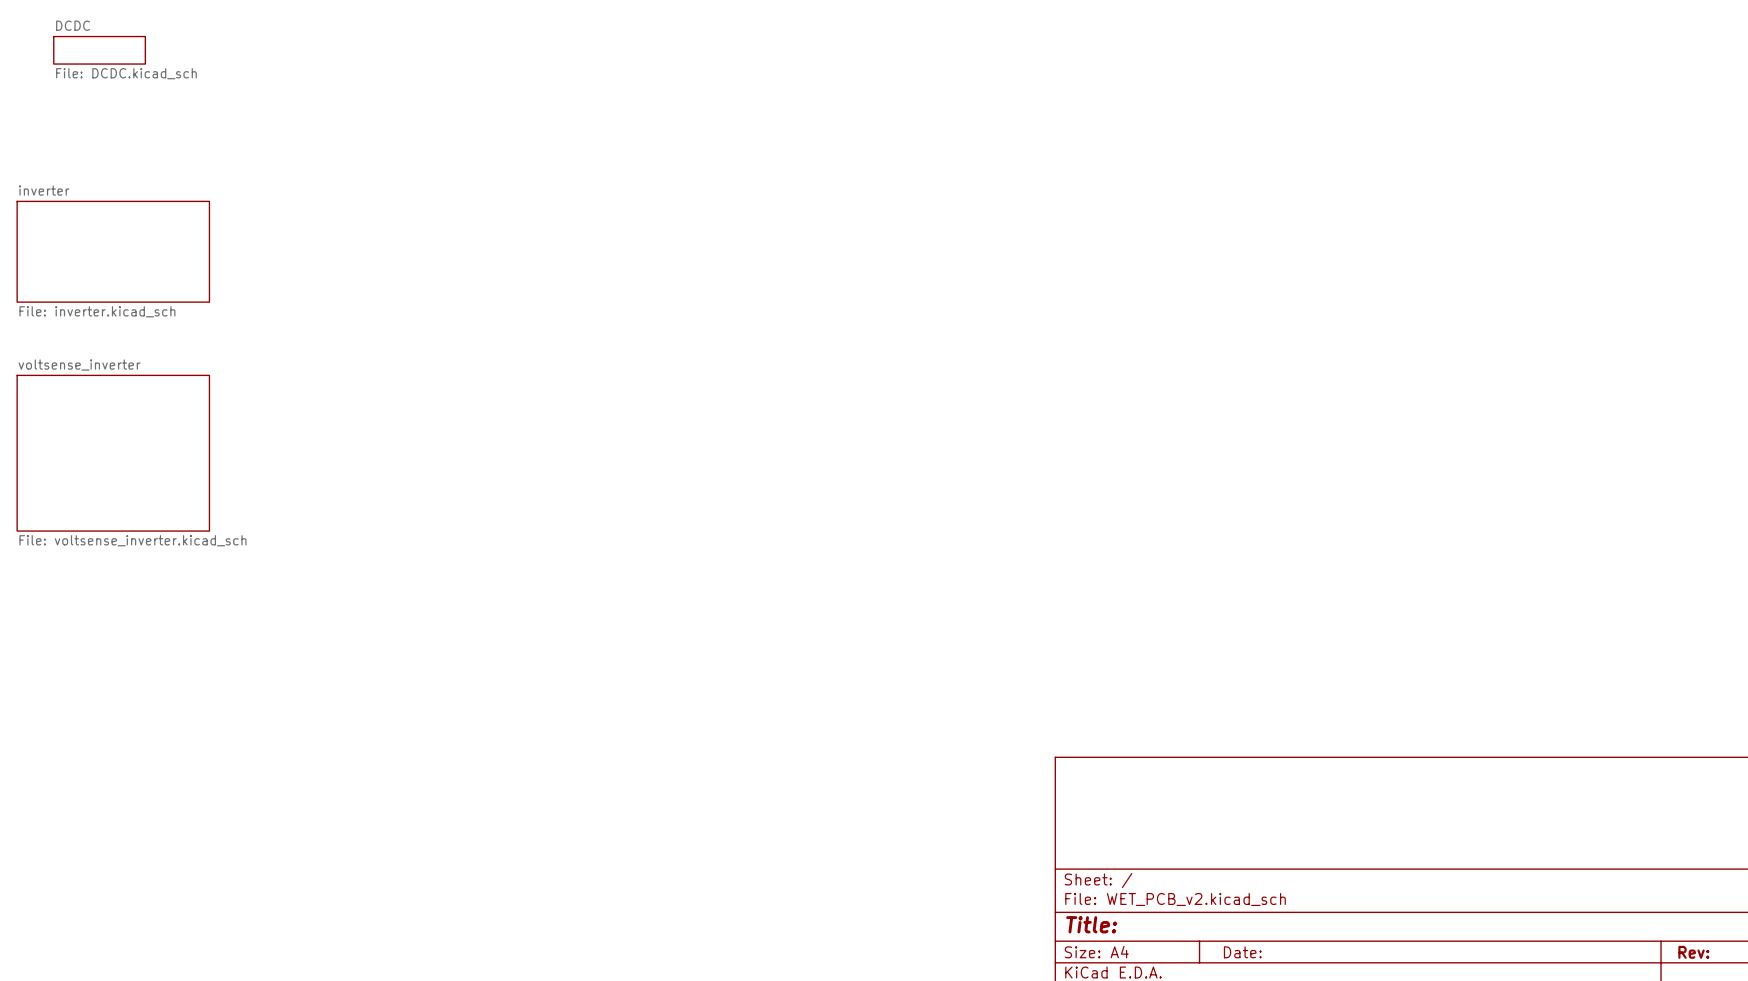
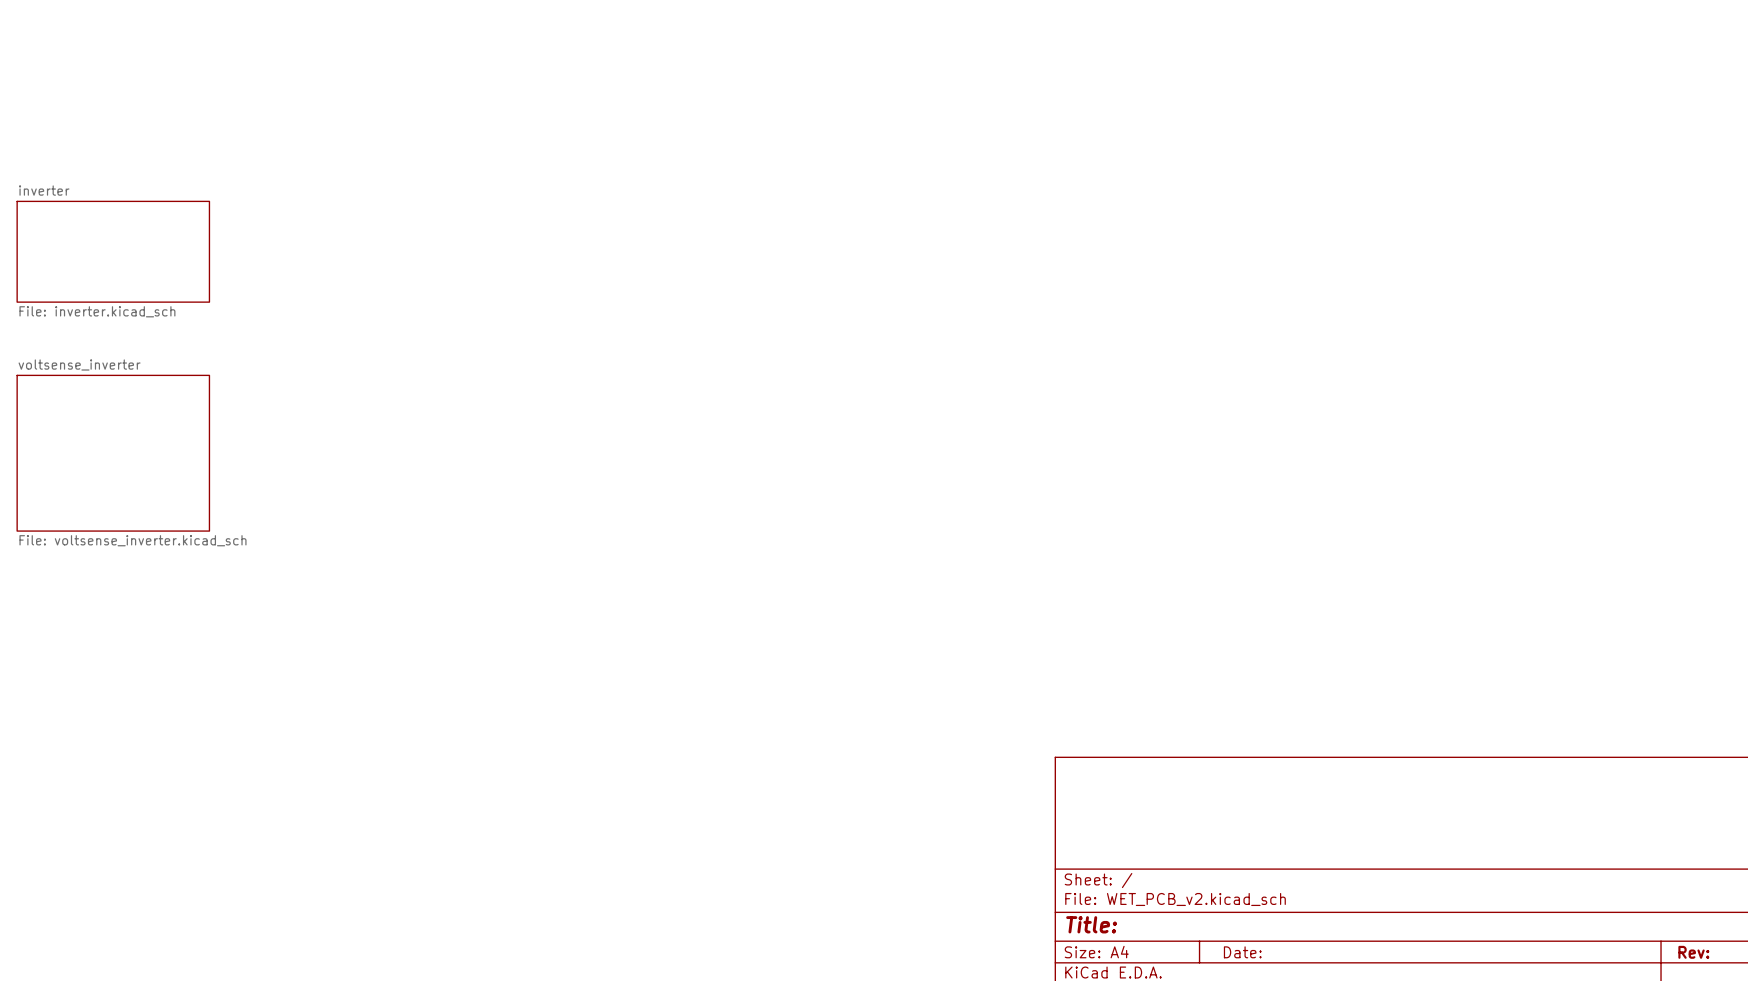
sheet DCDC: File: DCDC.kicad_sch (99, 50) -> none

